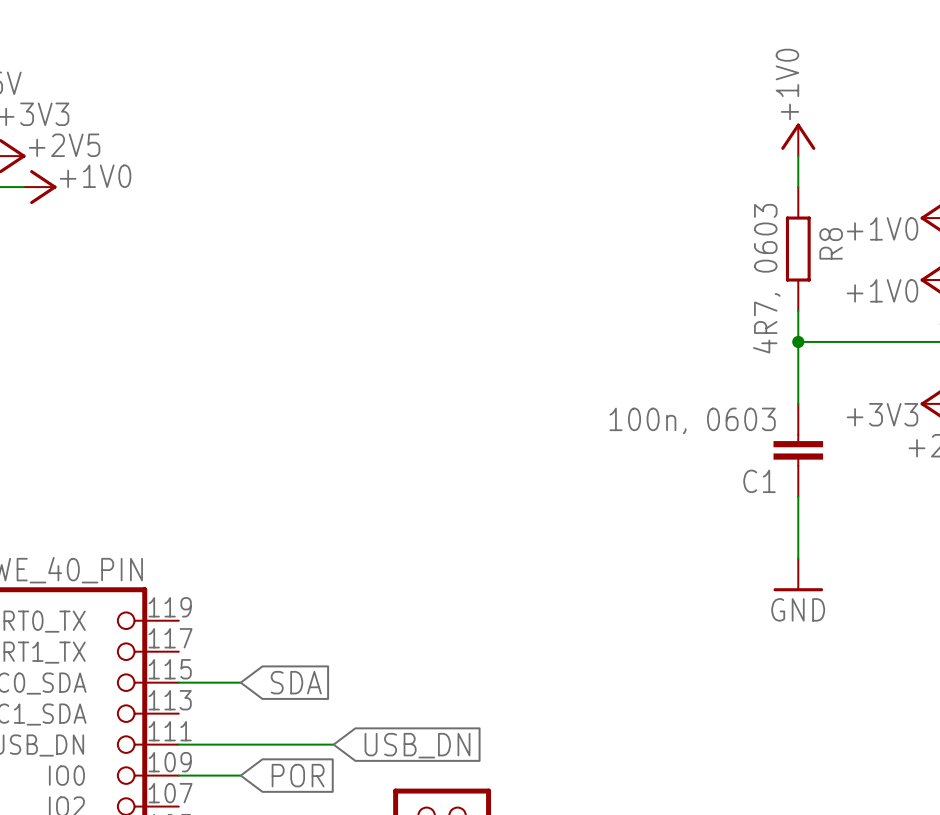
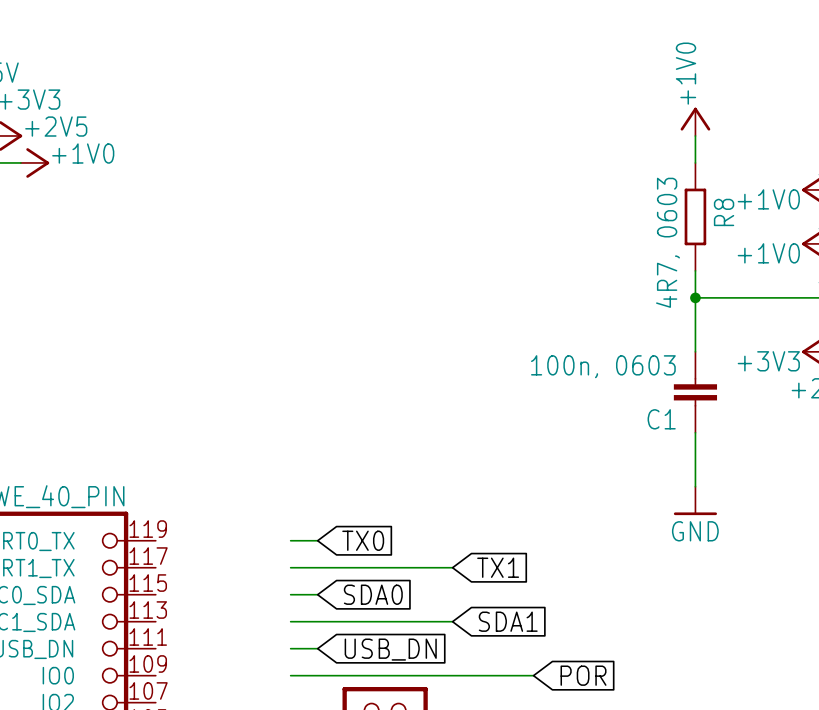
wire: none -> (290, 540) (317, 540)
global label: none -> TX0 (363, 540)
wire: none -> (290, 567) (452, 567)
global label: none -> TX1 (498, 567)
wire: (178, 682) (240, 682) -> none
global label: SDA (296, 682) -> none
wire: none -> (290, 594) (317, 594)
global label: none -> SDA0 (373, 594)
wire: none -> (290, 621) (452, 621)
global label: none -> SDA1 (508, 621)
wire: (178, 744) (333, 744) -> (317, 648) (290, 648)
global label position: USB_DN (417, 745) -> USB_DN (390, 649)
wire: (178, 775) (240, 775) -> none
global label: POR (298, 775) -> none
wire: none -> (290, 675) (533, 675)
global label: none -> POR (583, 675)

